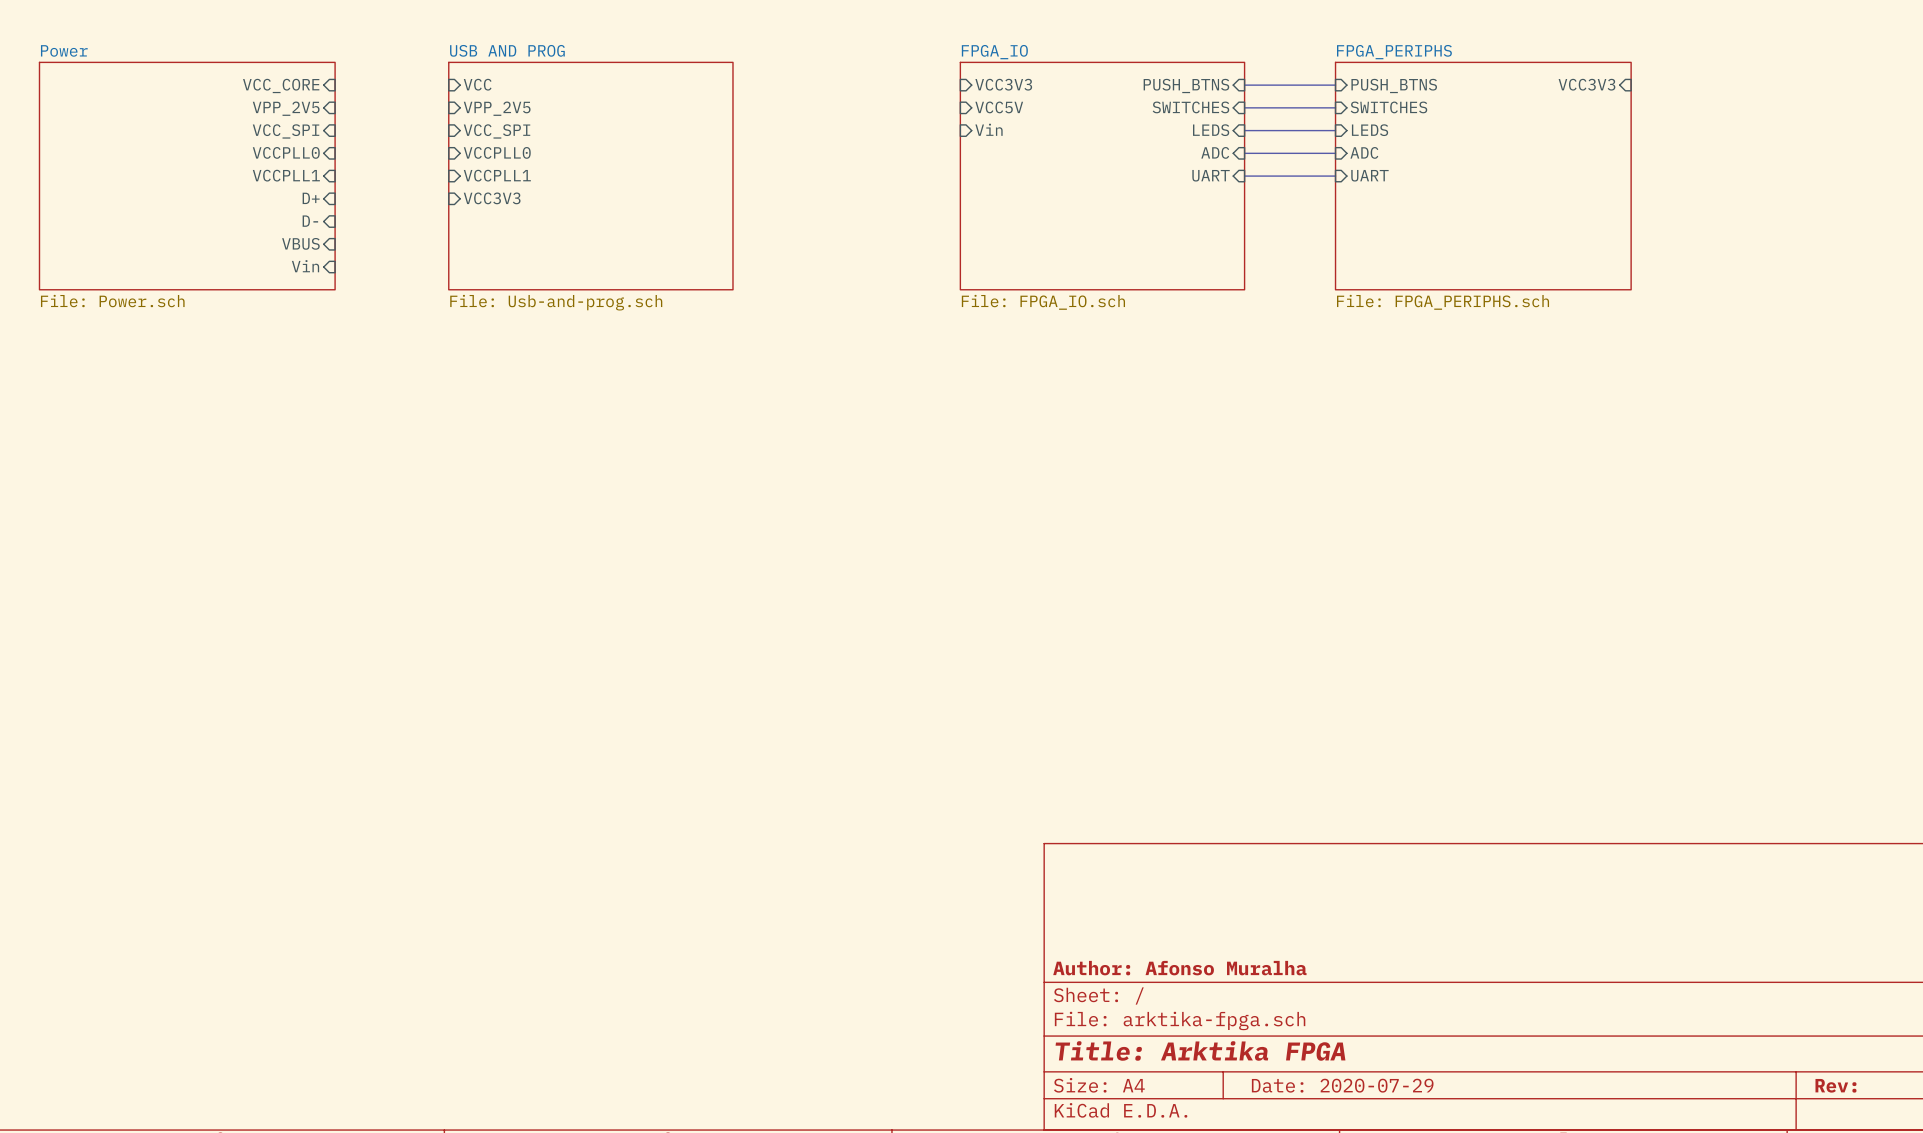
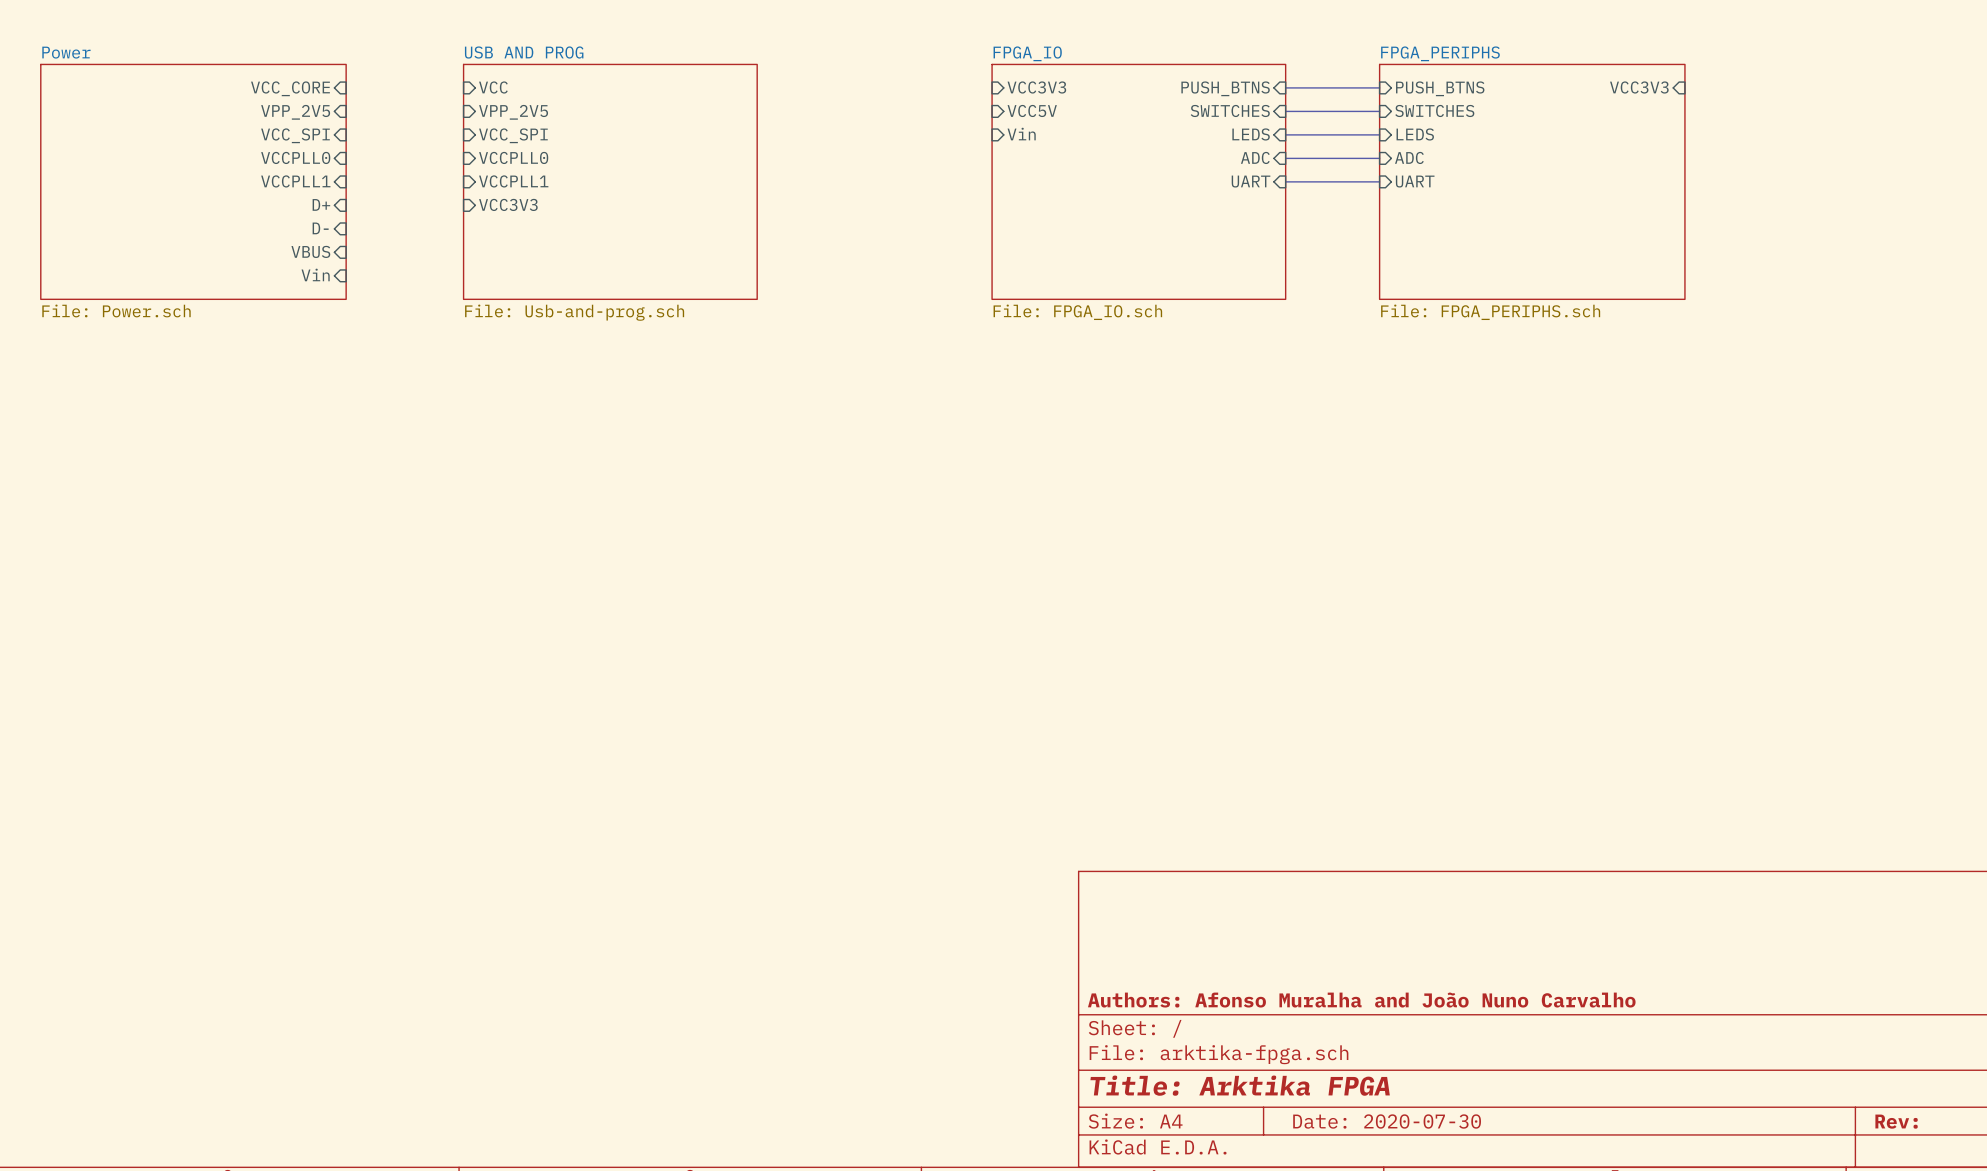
title block: Author: Afonso Muralha (1179, 968) -> Authors: Afonso Muralha and João Nuno Carvalho (1361, 1000)
title block: Date: 2020-07-29 (1342, 1085) -> Date: 2020-07-30 (1387, 1121)

